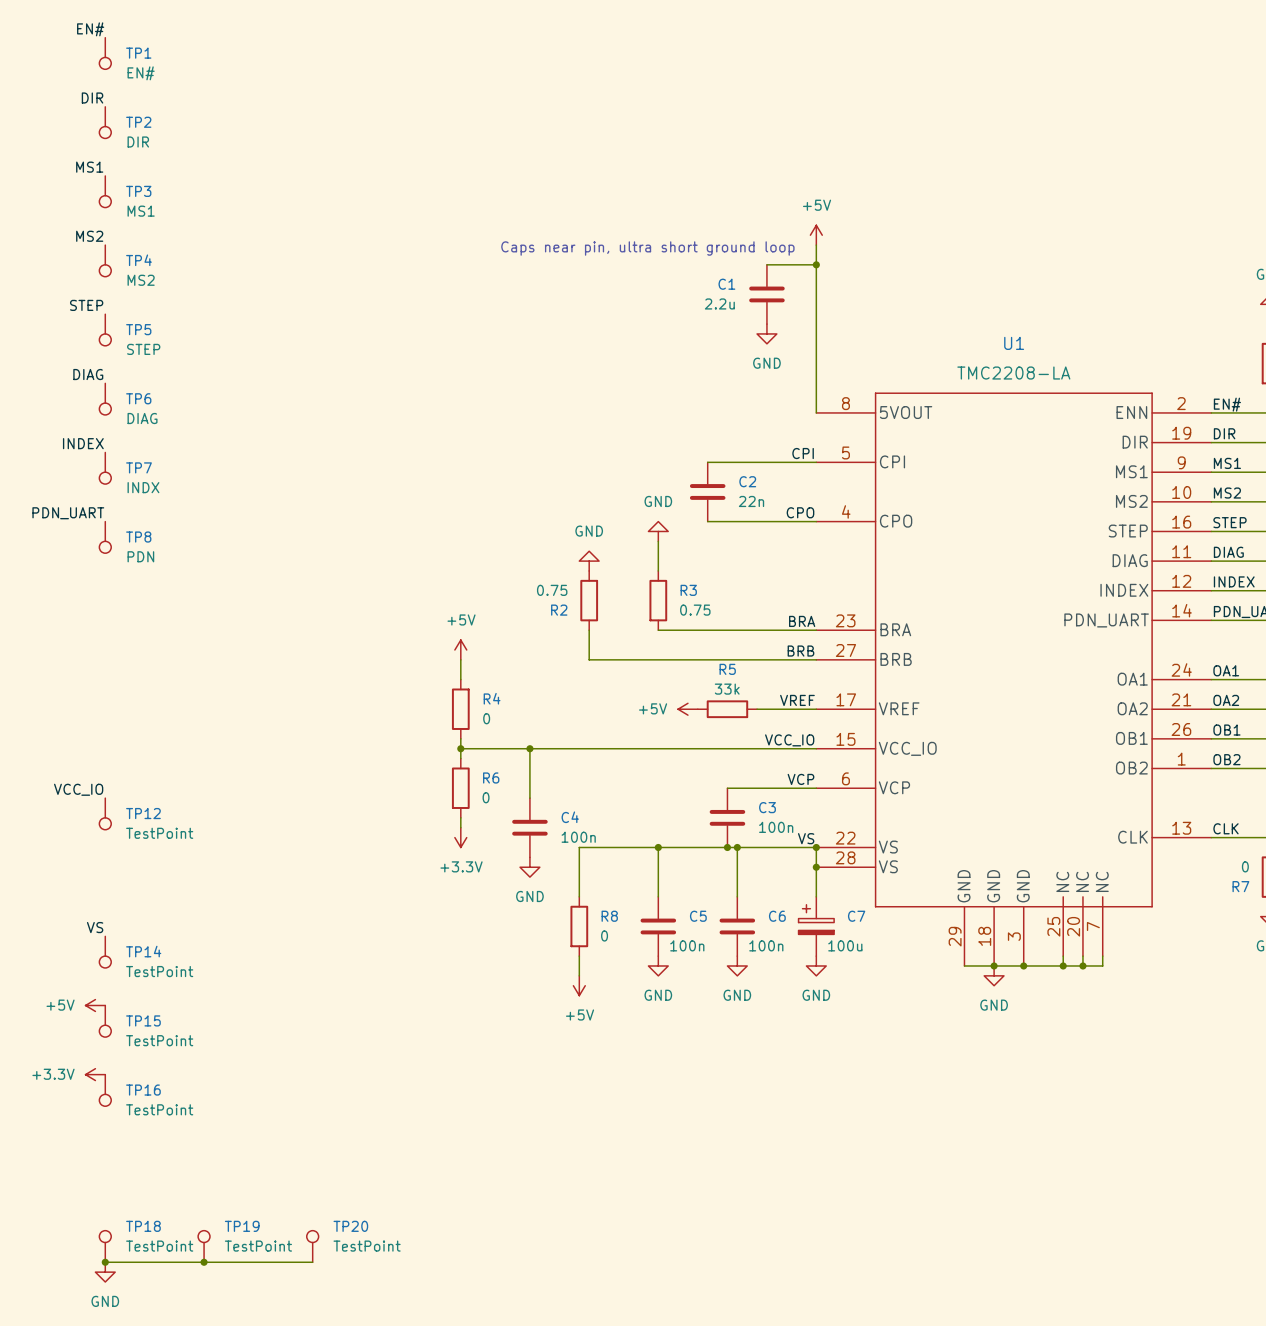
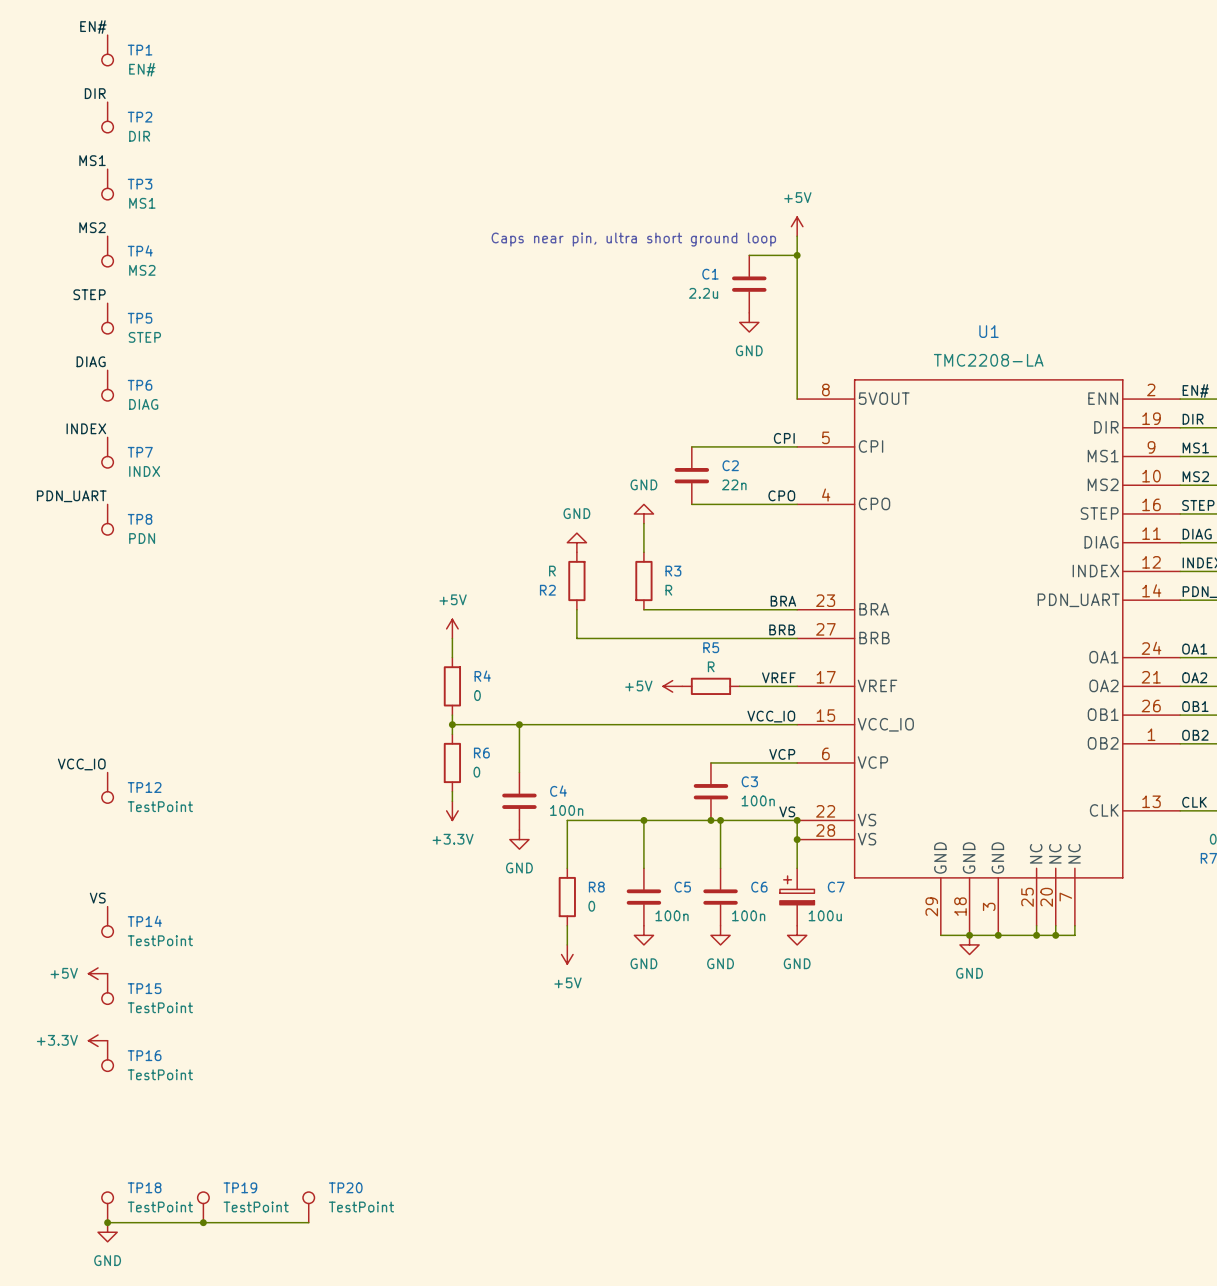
R2 value: 0.75 (552, 590) -> R (552, 571)
R3 value: 0.75 (695, 610) -> R (668, 590)
R5 value: 33k (727, 689) -> R (711, 666)

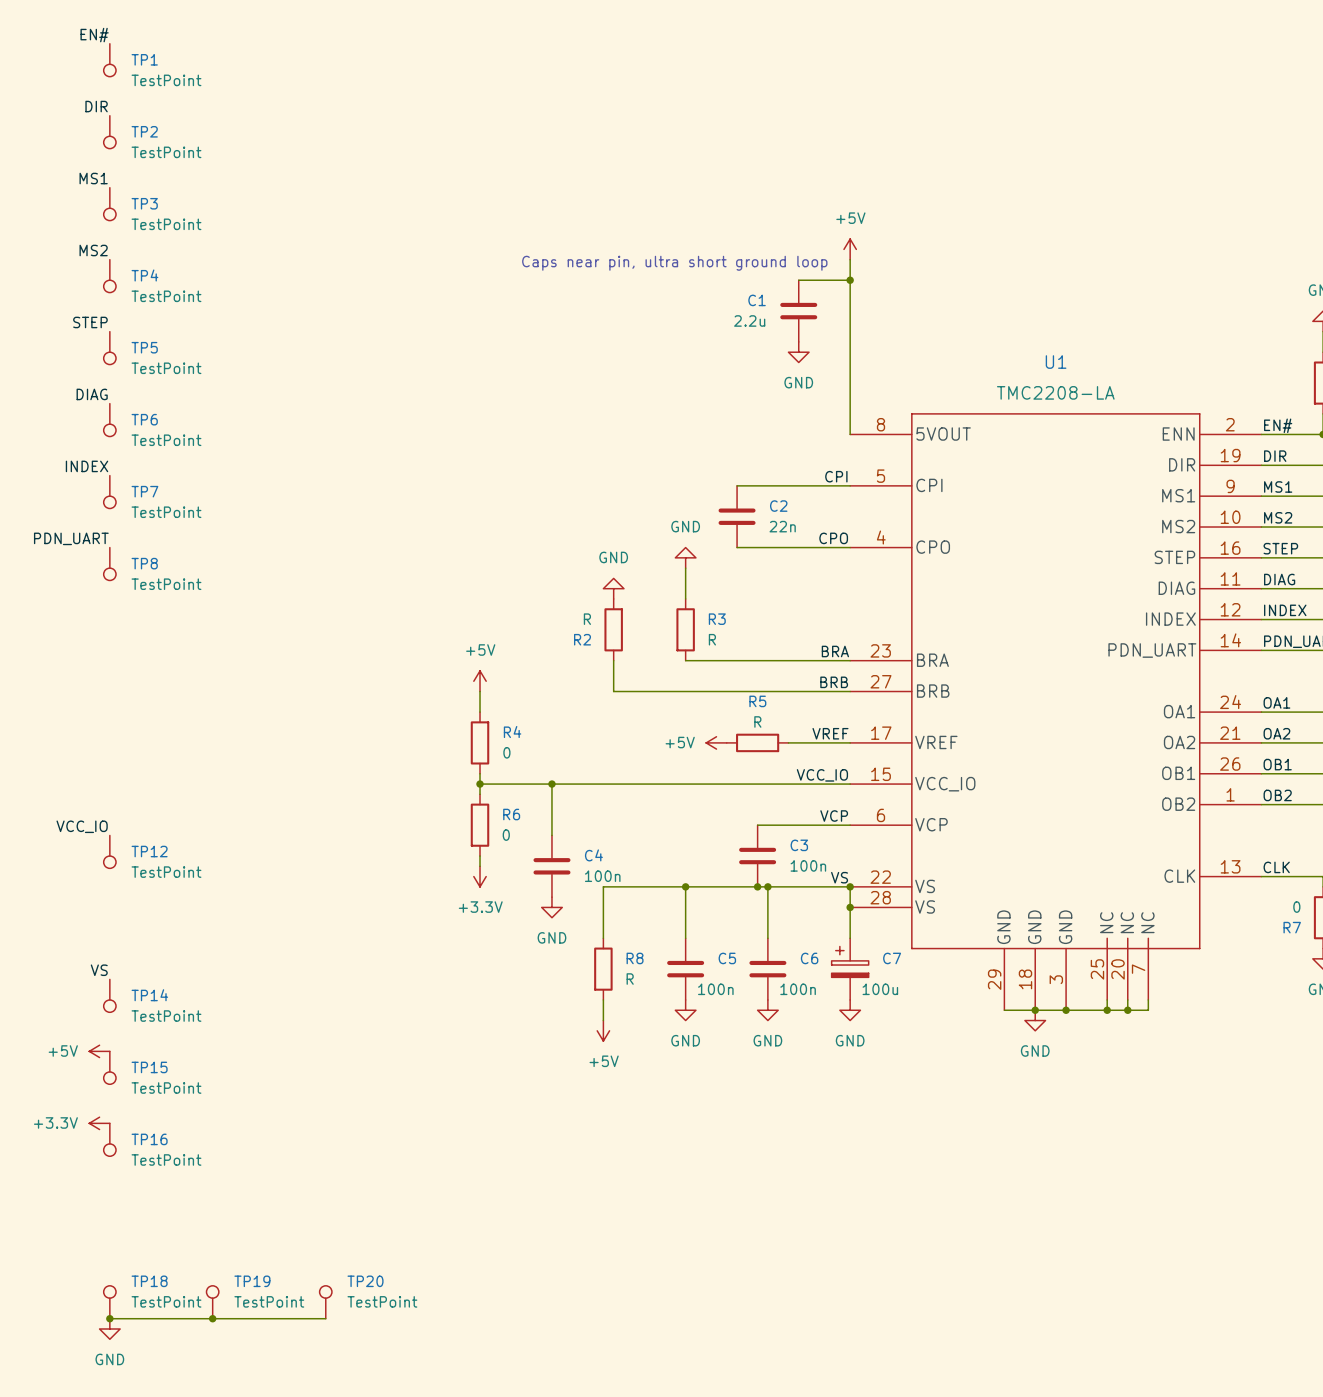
TP1 value: EN# (142, 69) -> TestPoint (166, 80)
TP2 value: DIR (139, 136) -> TestPoint (166, 152)
TP3 value: MS1 (142, 203) -> TestPoint (166, 224)
TP4 value: MS2 (142, 270) -> TestPoint (166, 296)
TP5 value: STEP (144, 337) -> TestPoint (166, 368)
TP6 value: DIAG (143, 404) -> TestPoint (166, 440)
TP7 value: INDX (144, 471) -> TestPoint (166, 512)
TP8 value: PDN (142, 538) -> TestPoint (166, 584)
R8 value: 0 (591, 906) -> R (630, 979)

